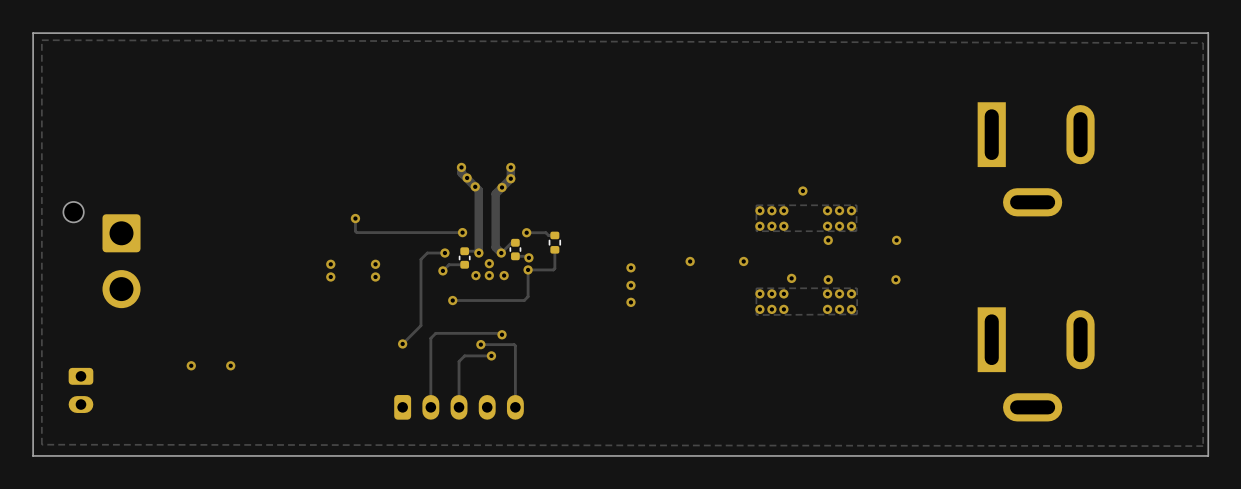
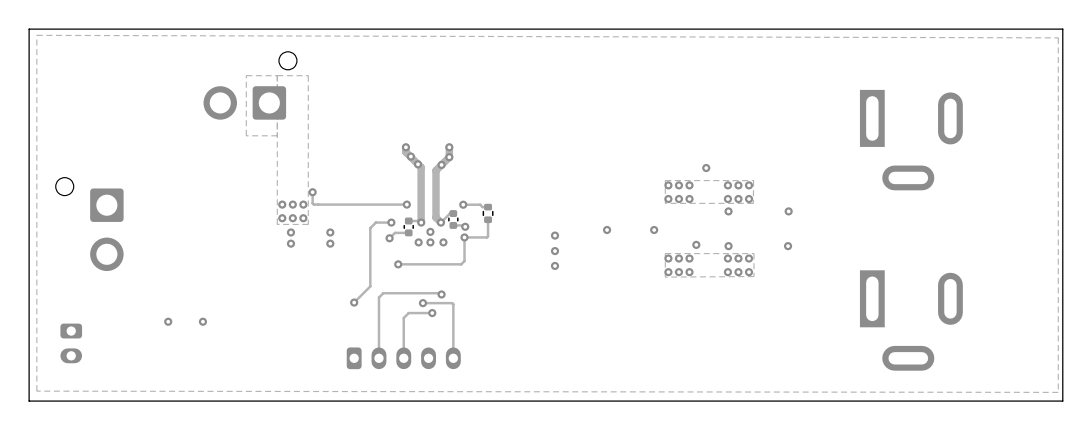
zone outline: none -> (277, 75) (277, 224) (308, 224) (308, 75) (246, 75) (246, 135) (277, 135)
part: none -> (250, 85)
via: none -> (282, 204)
via: none -> (292, 204)
via: none -> (303, 204)
via: none -> (282, 218)
via: none -> (292, 218)
via: none -> (303, 218)

